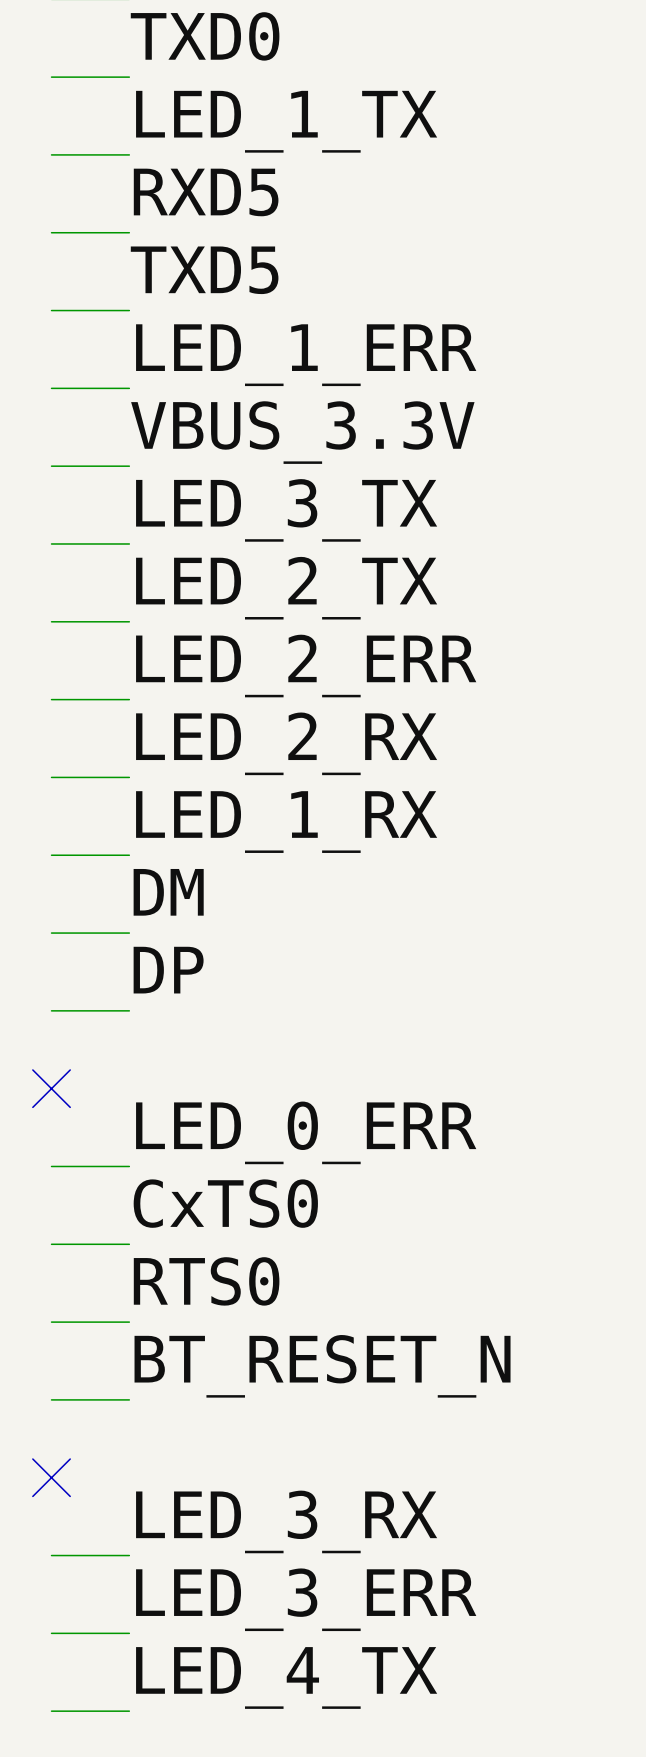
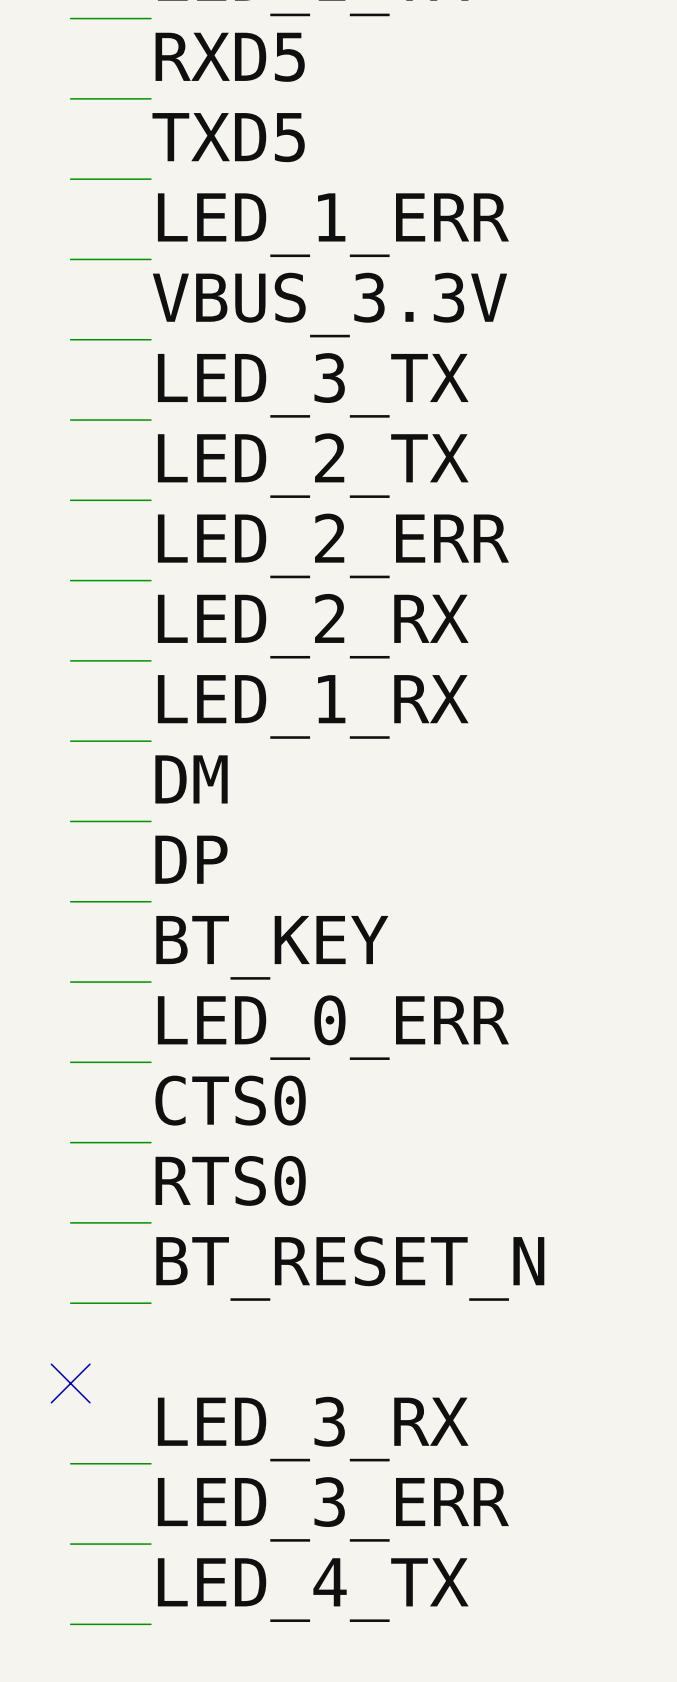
label: none -> BT_KEY (272, 947)
wire: none -> (70, 982) (150, 982)
no-connect mark: (51, 1088) -> none
label: CxTS0 (225, 1203) -> CTS0 (230, 1100)

